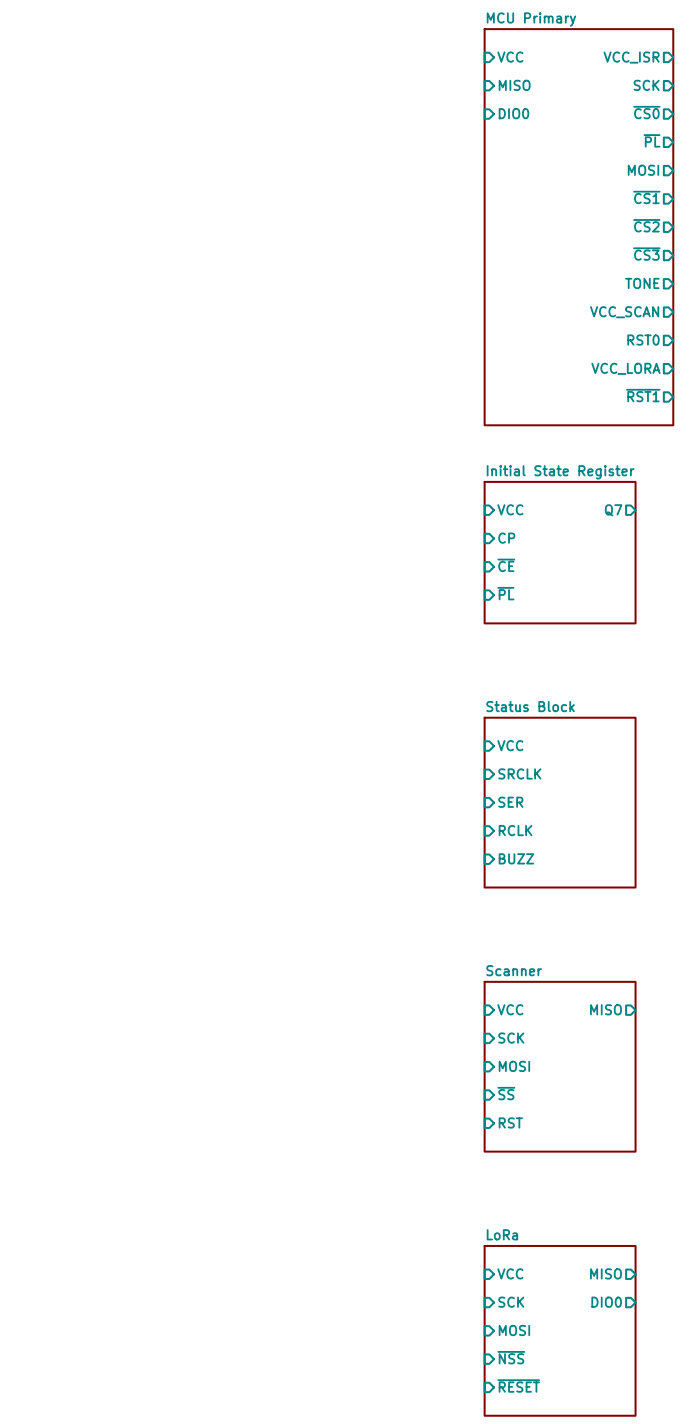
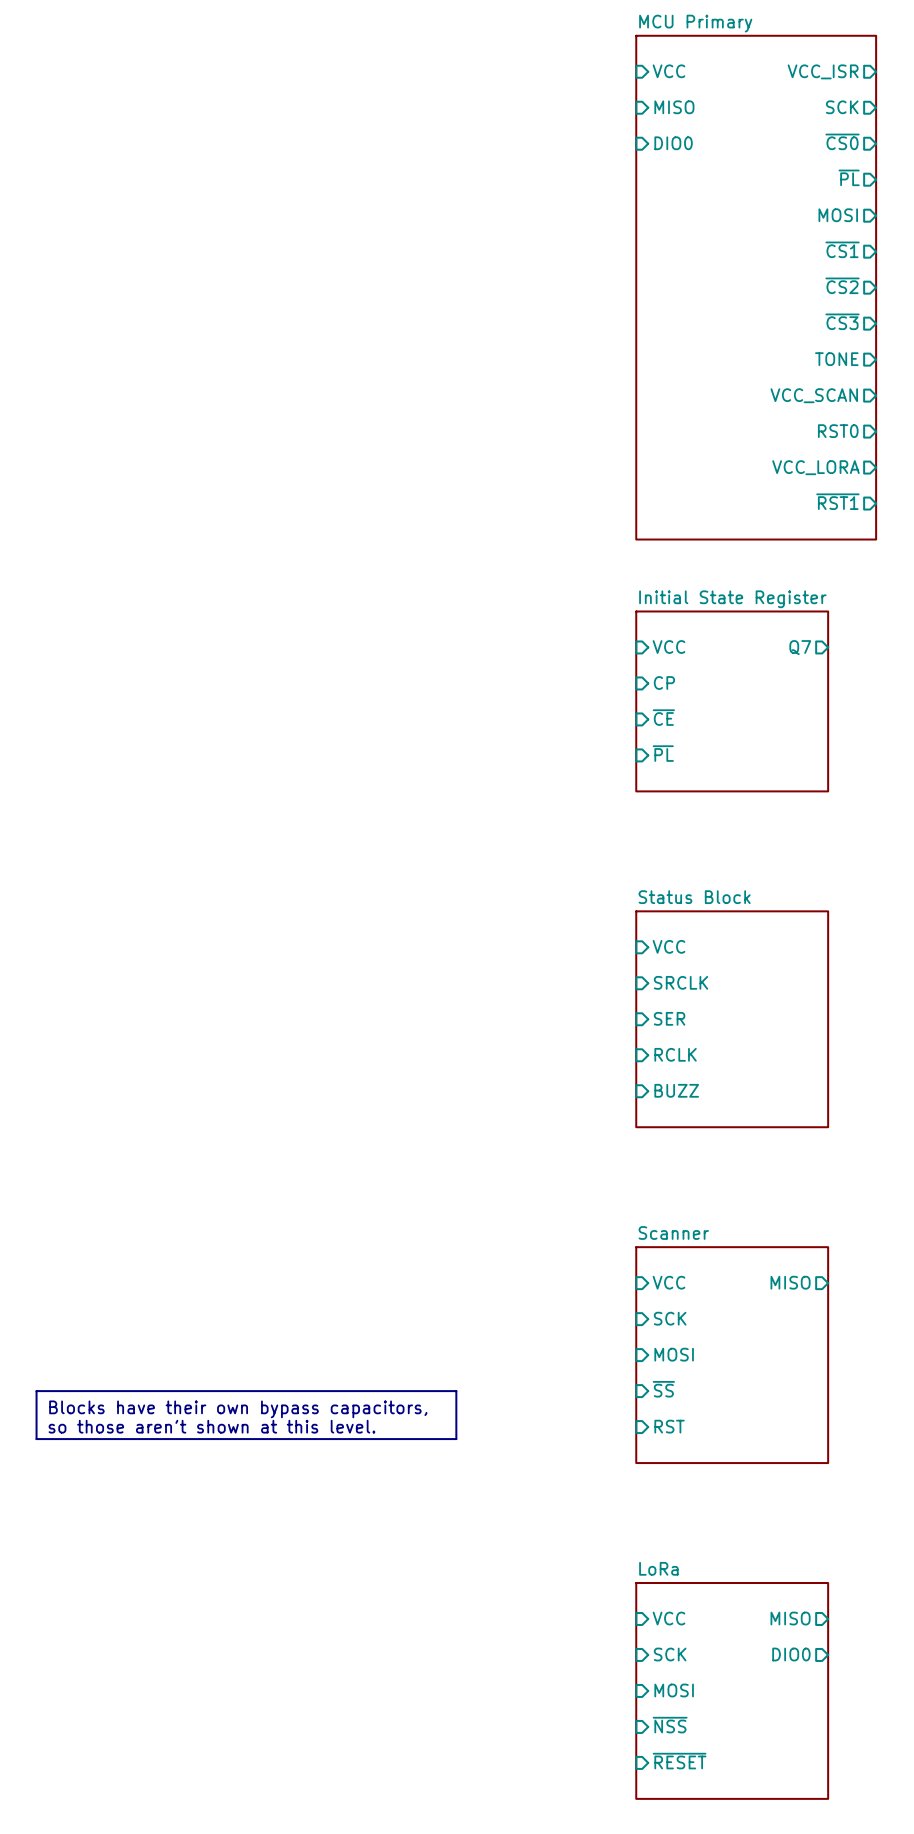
line: none -> (36, 1391) (456, 1391) (456, 1439) (36, 1439) (36, 1391)
text: none -> Blocks have their own bypass capacitors, (238, 1409)
text: none -> so those aren't shown at this level. (211, 1426)

